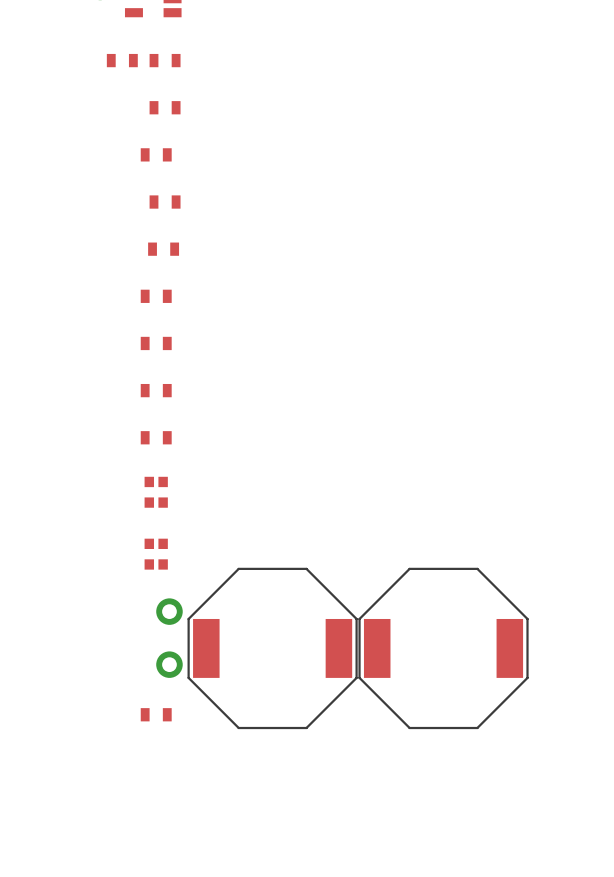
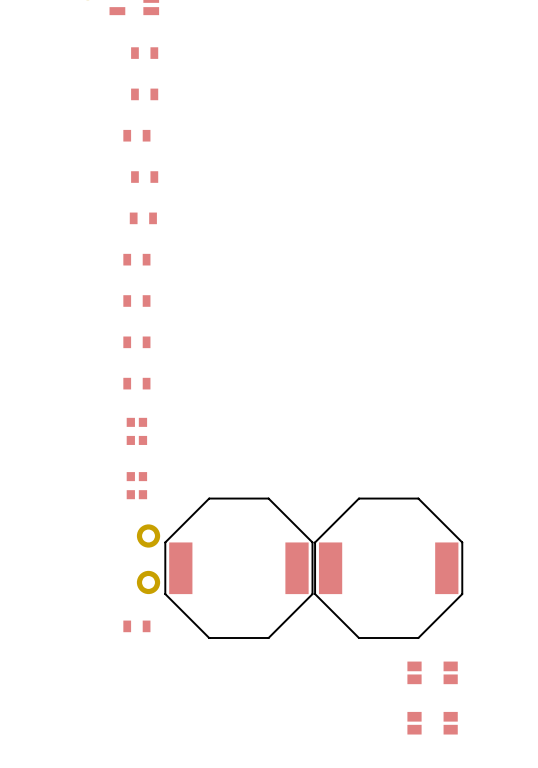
part: (122, 60) -> none
part: none -> (432, 672)
part: none -> (432, 723)

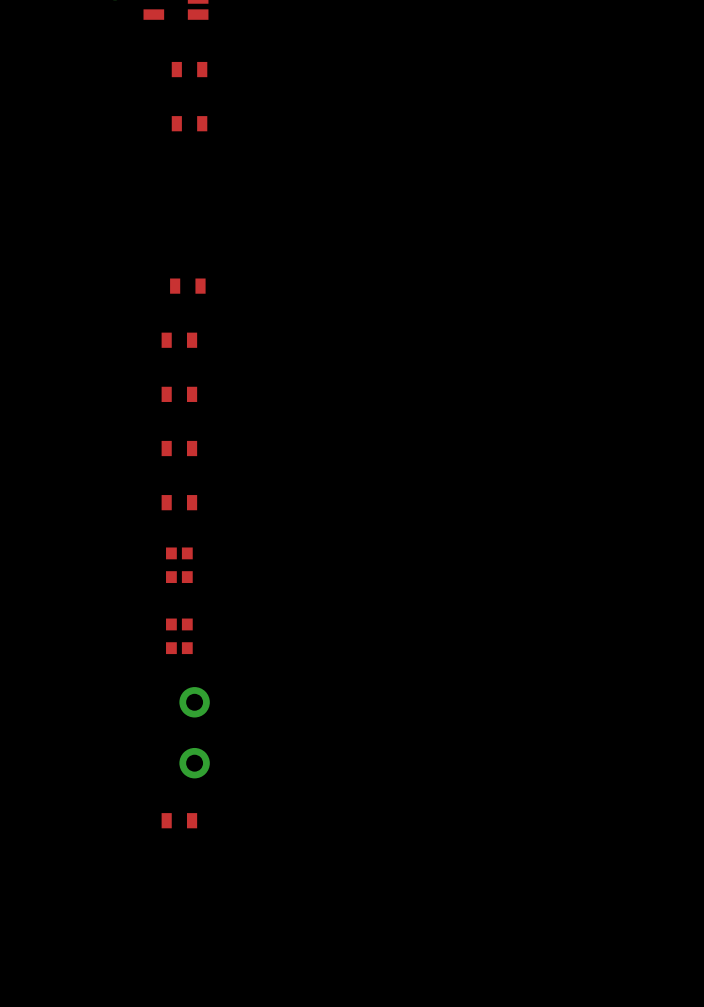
part: (136, 135) -> none
part: (144, 177) -> none
part: (238, 568) -> none
part: (388, 568) -> none
part: (432, 672) -> none
part: (432, 723) -> none

